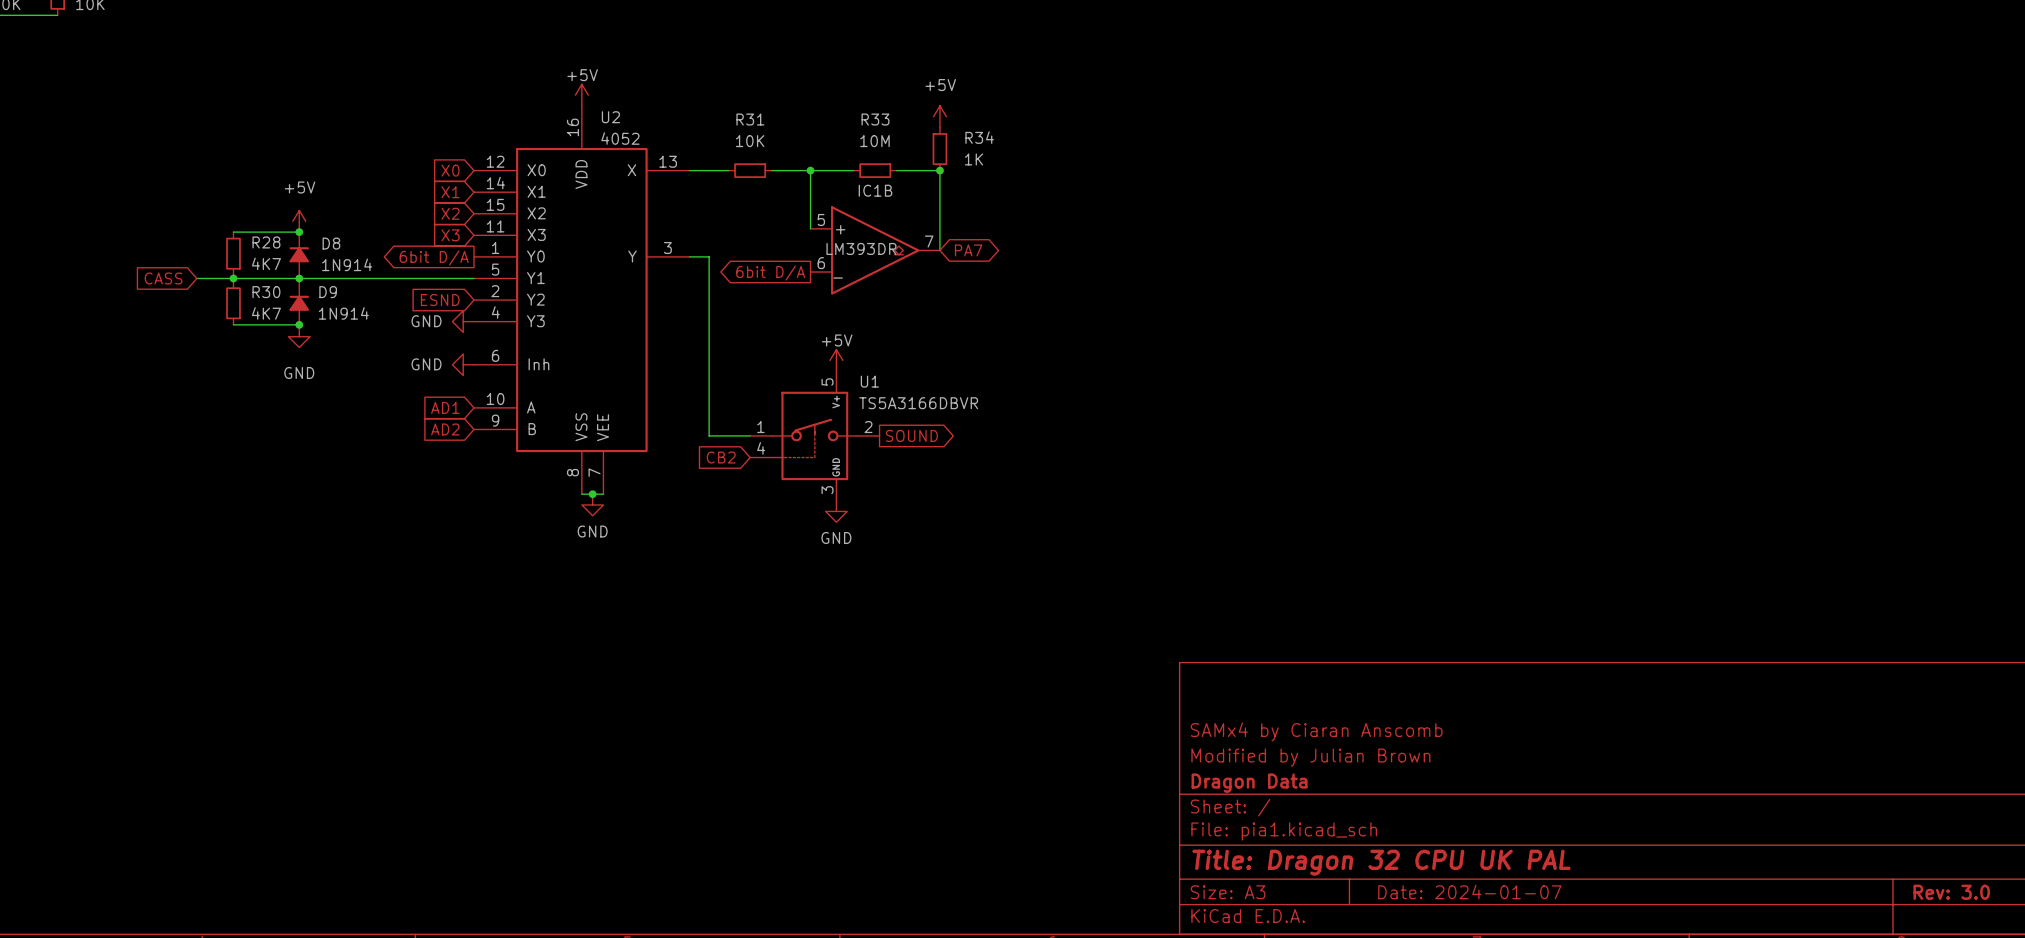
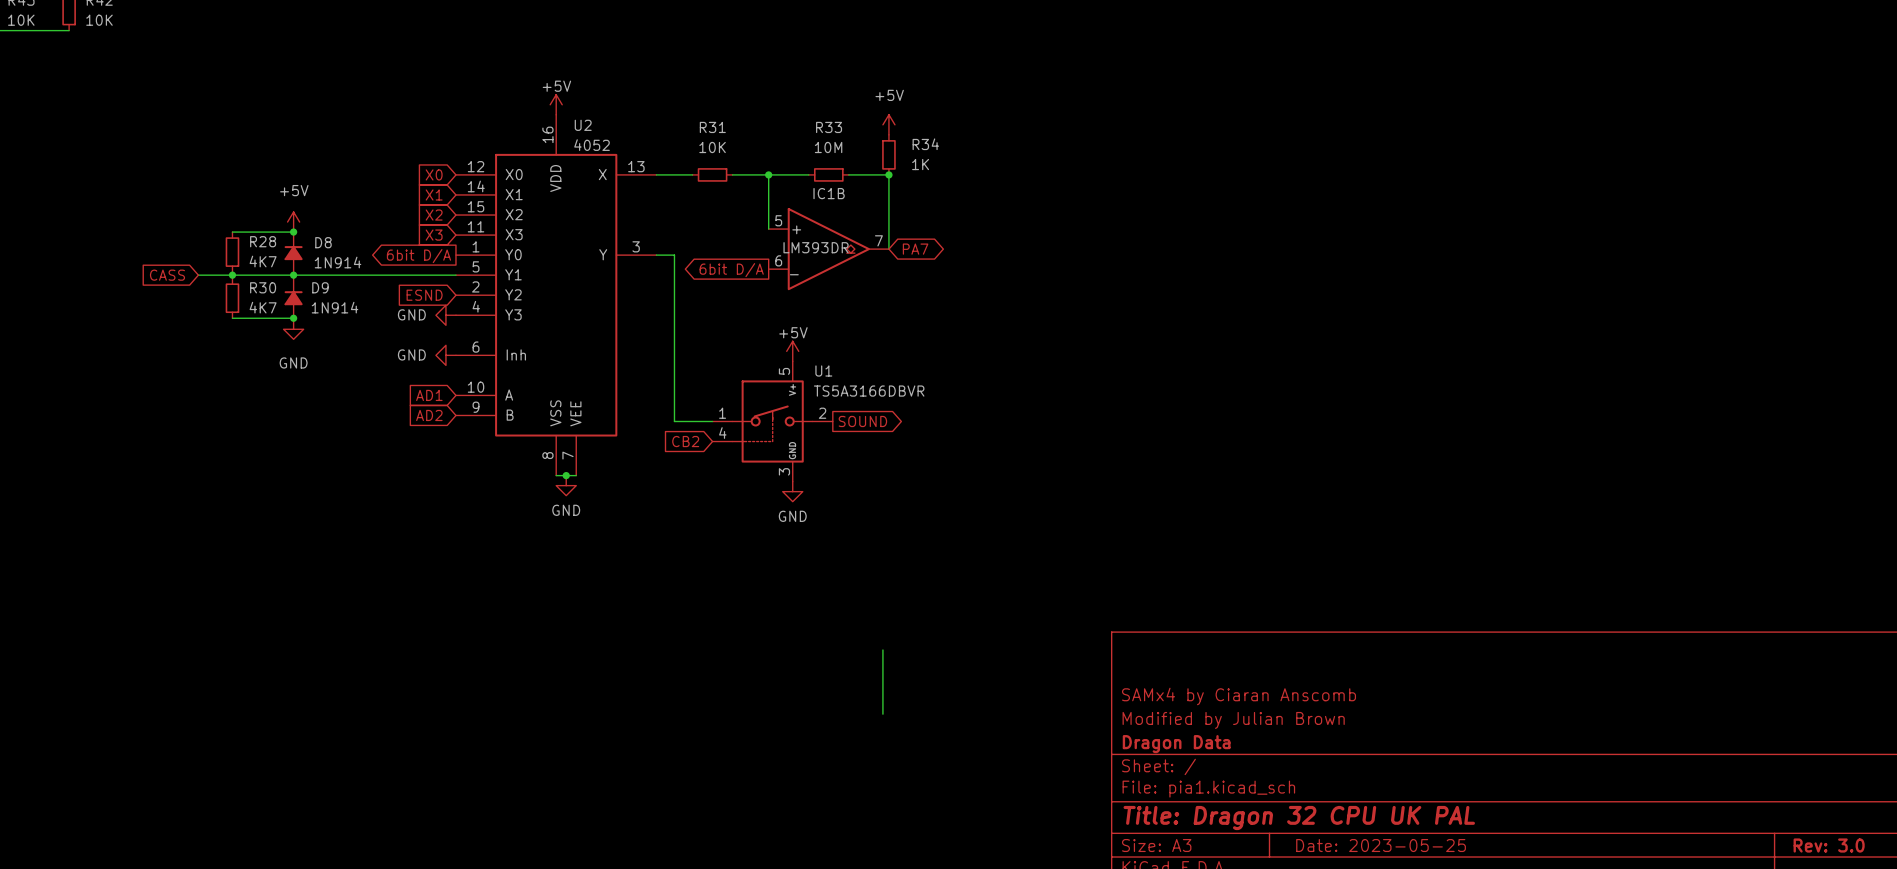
wire: none -> (882, 650) (882, 714)
title block: Date: 2024-01-07 (1469, 891) -> Date: 2023-05-25 (1381, 845)

